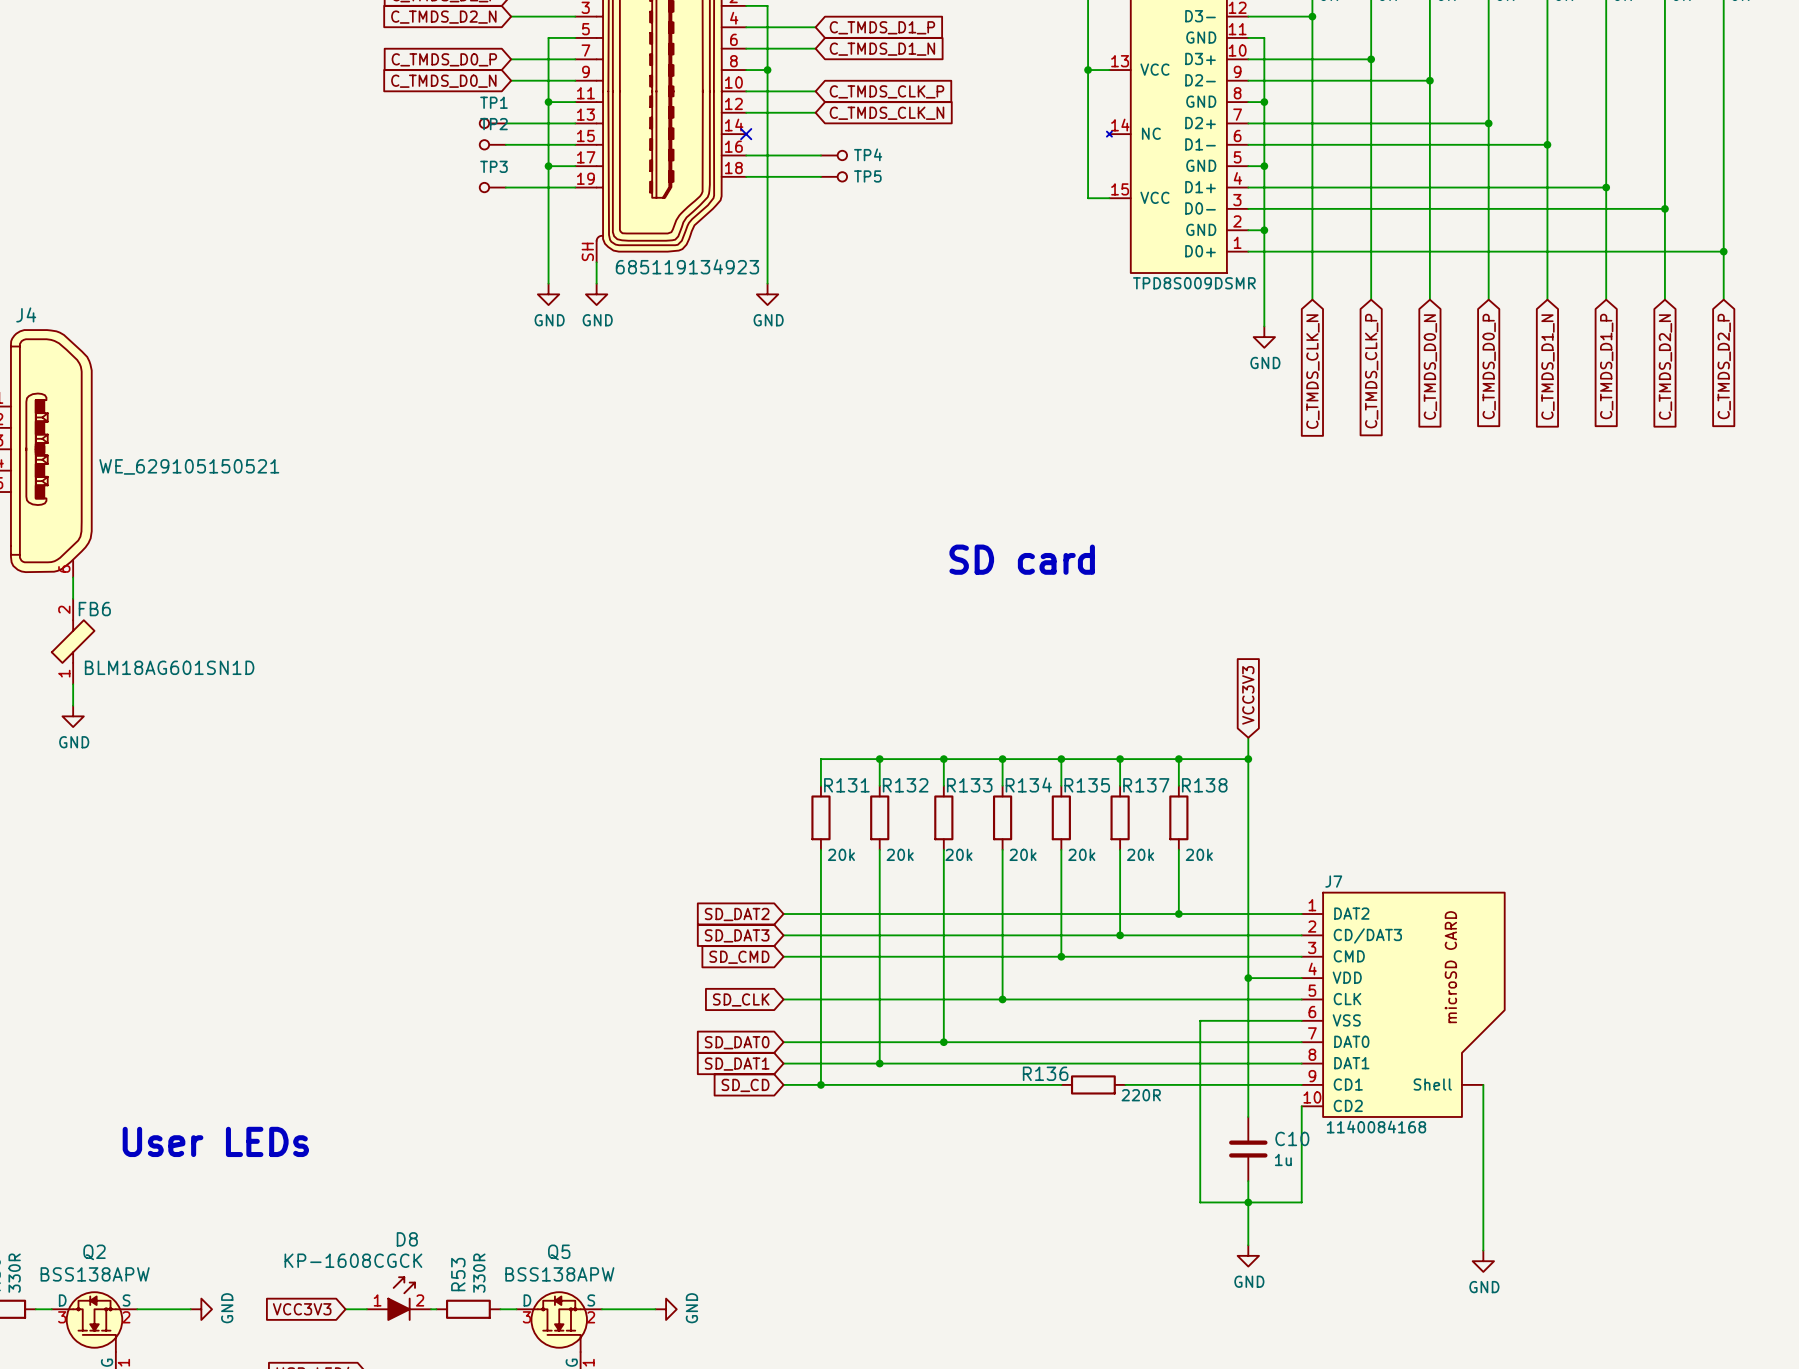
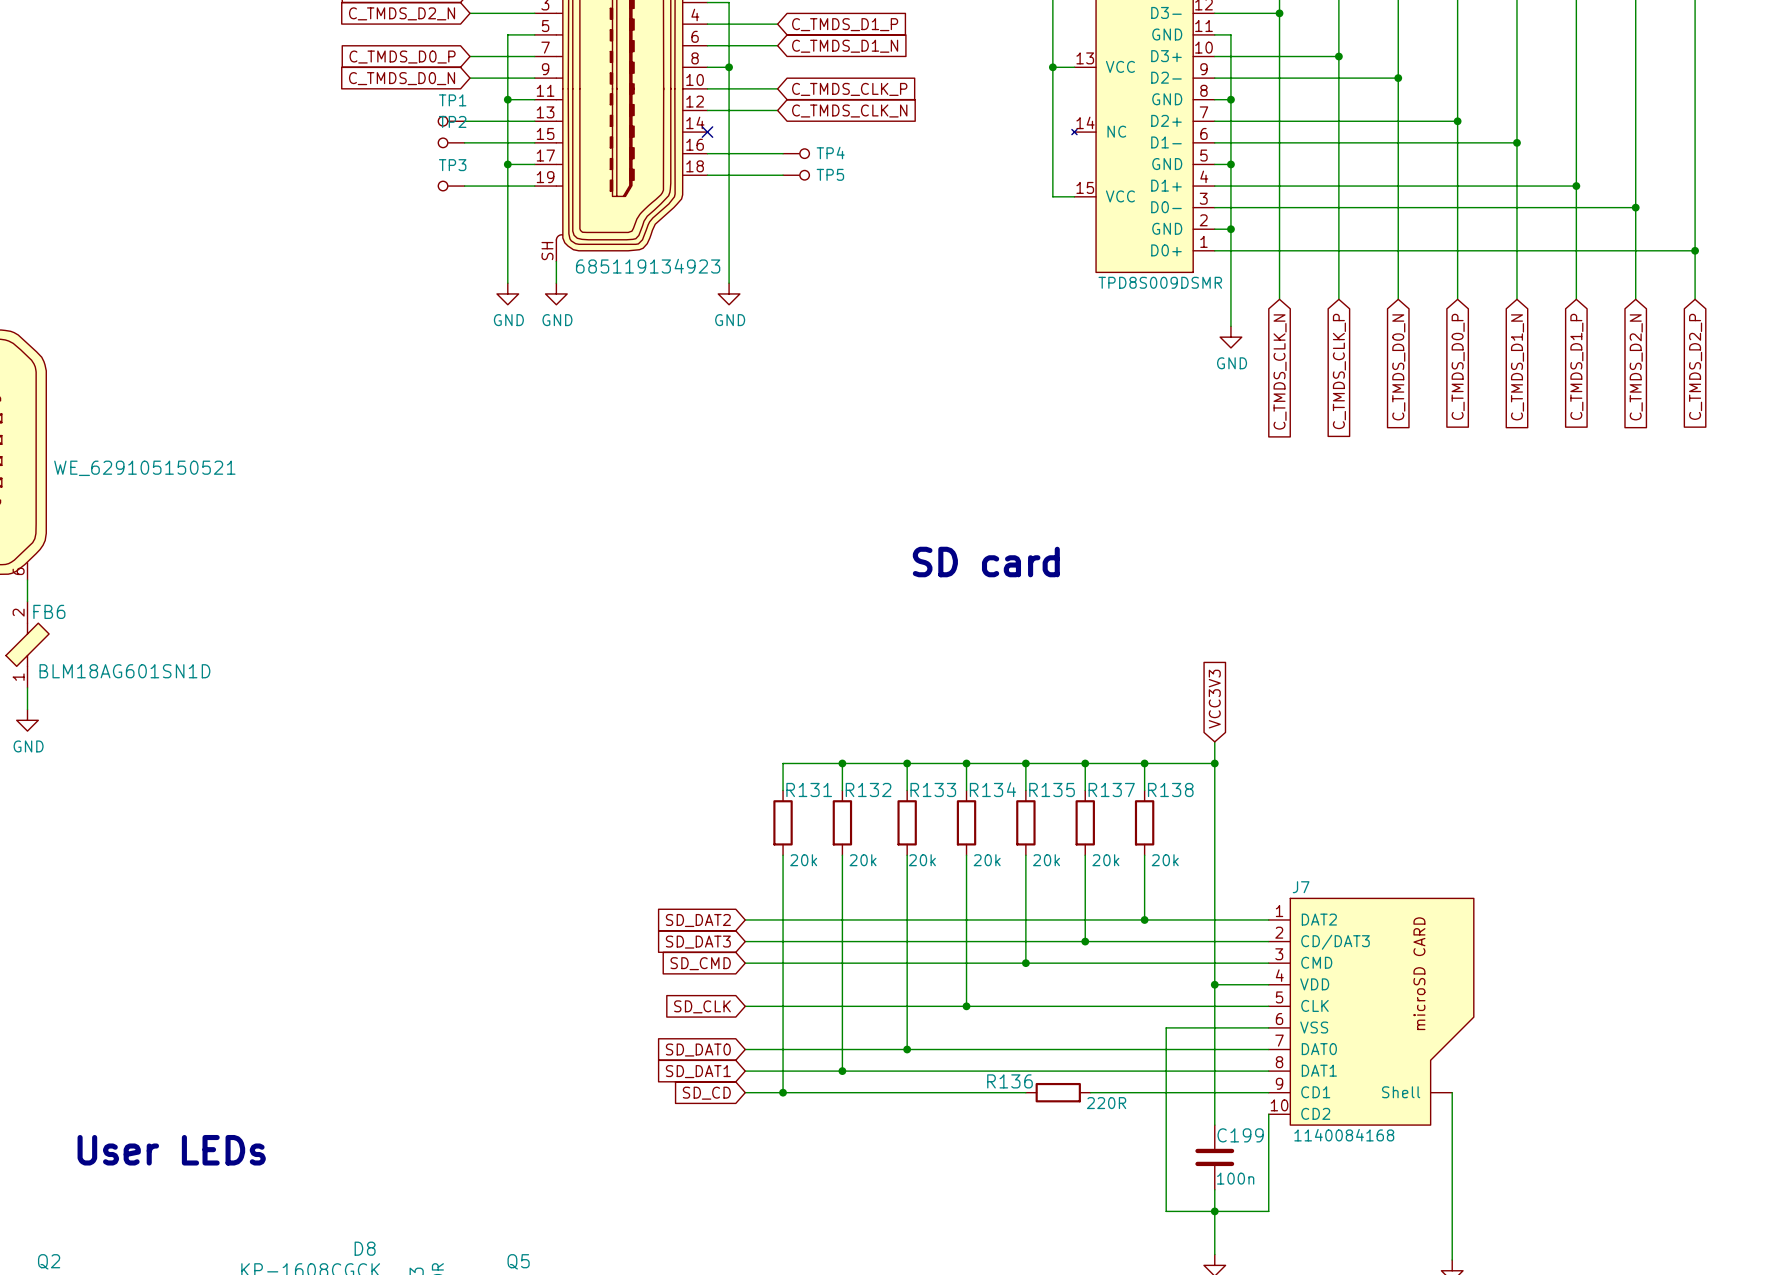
C10 name: C10 (1292, 1138) -> C199 (1240, 1135)
C10 text: 1u (1283, 1159) -> 100n (1235, 1178)

